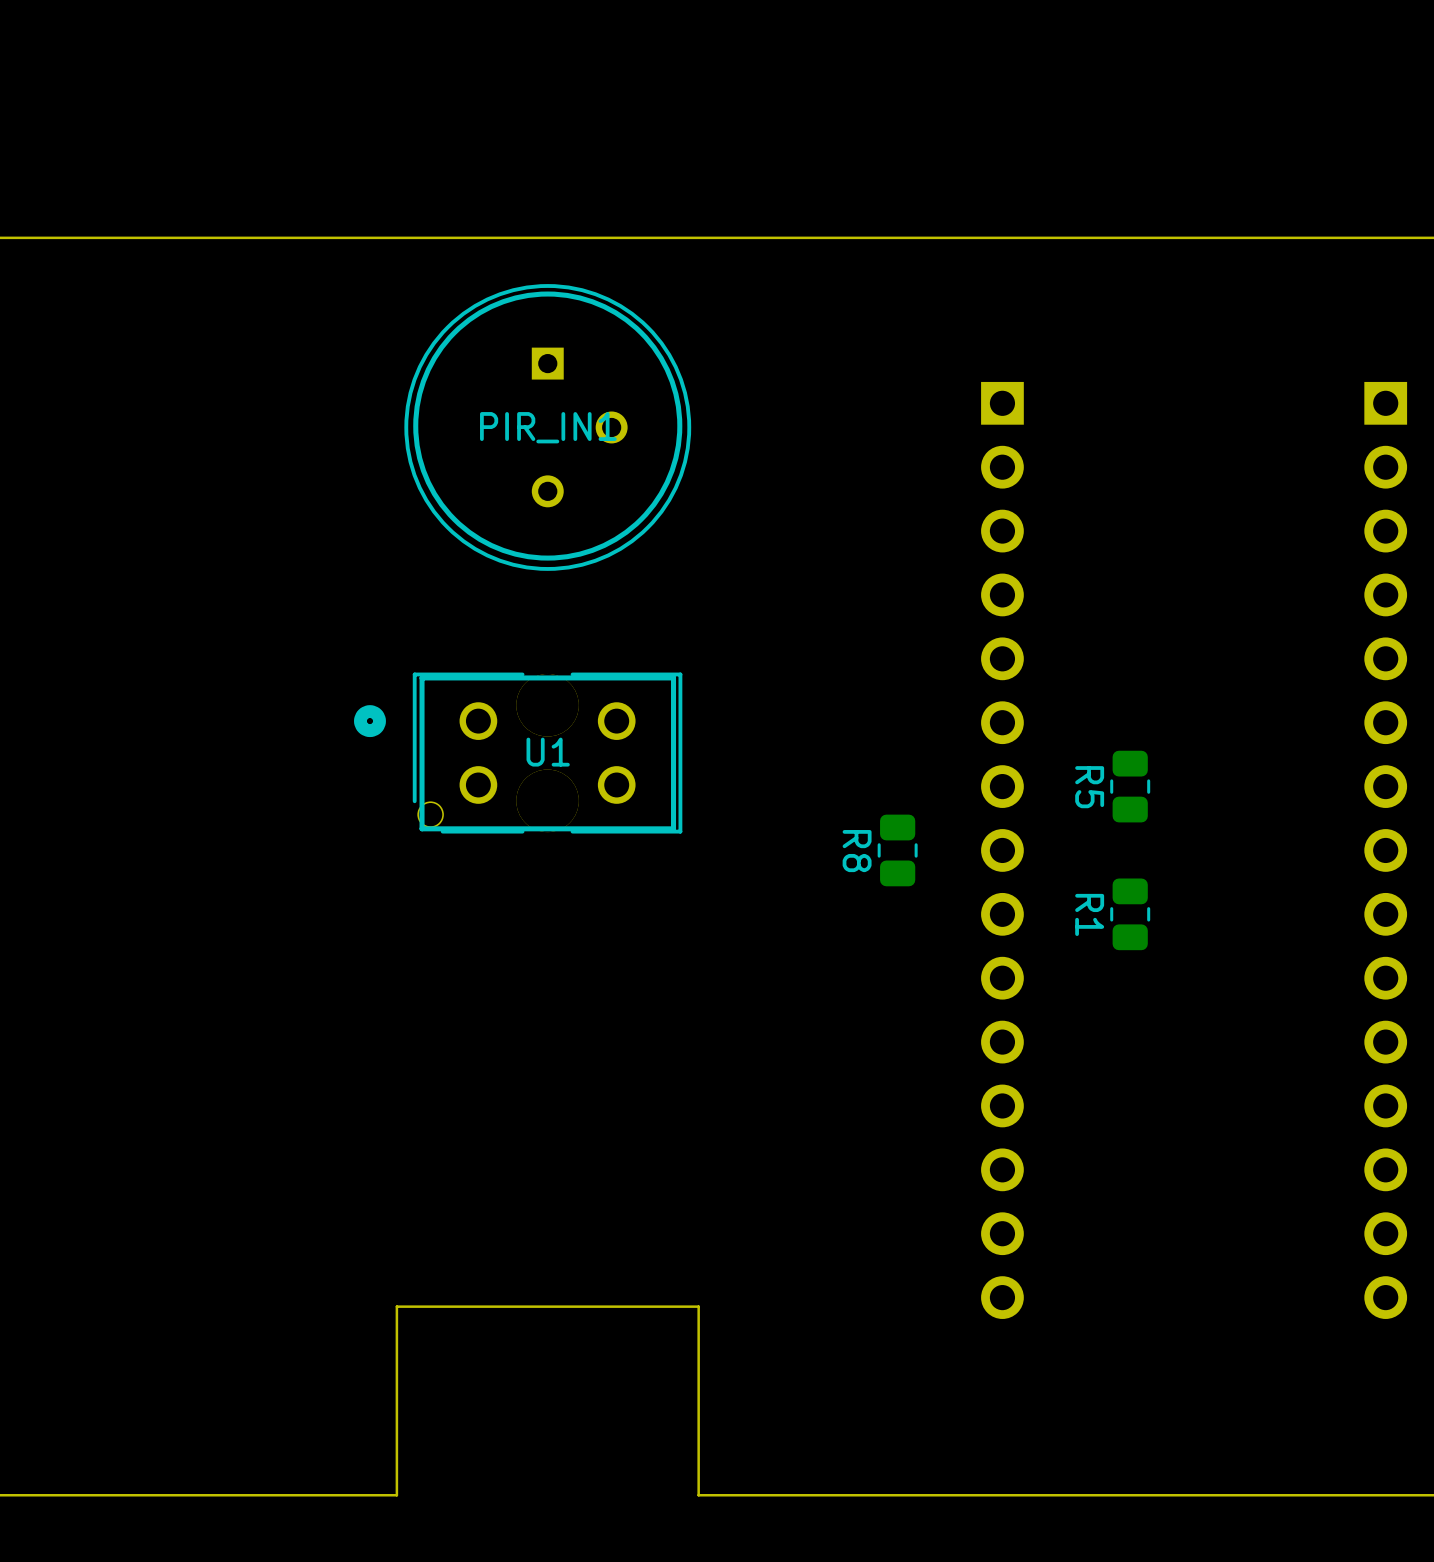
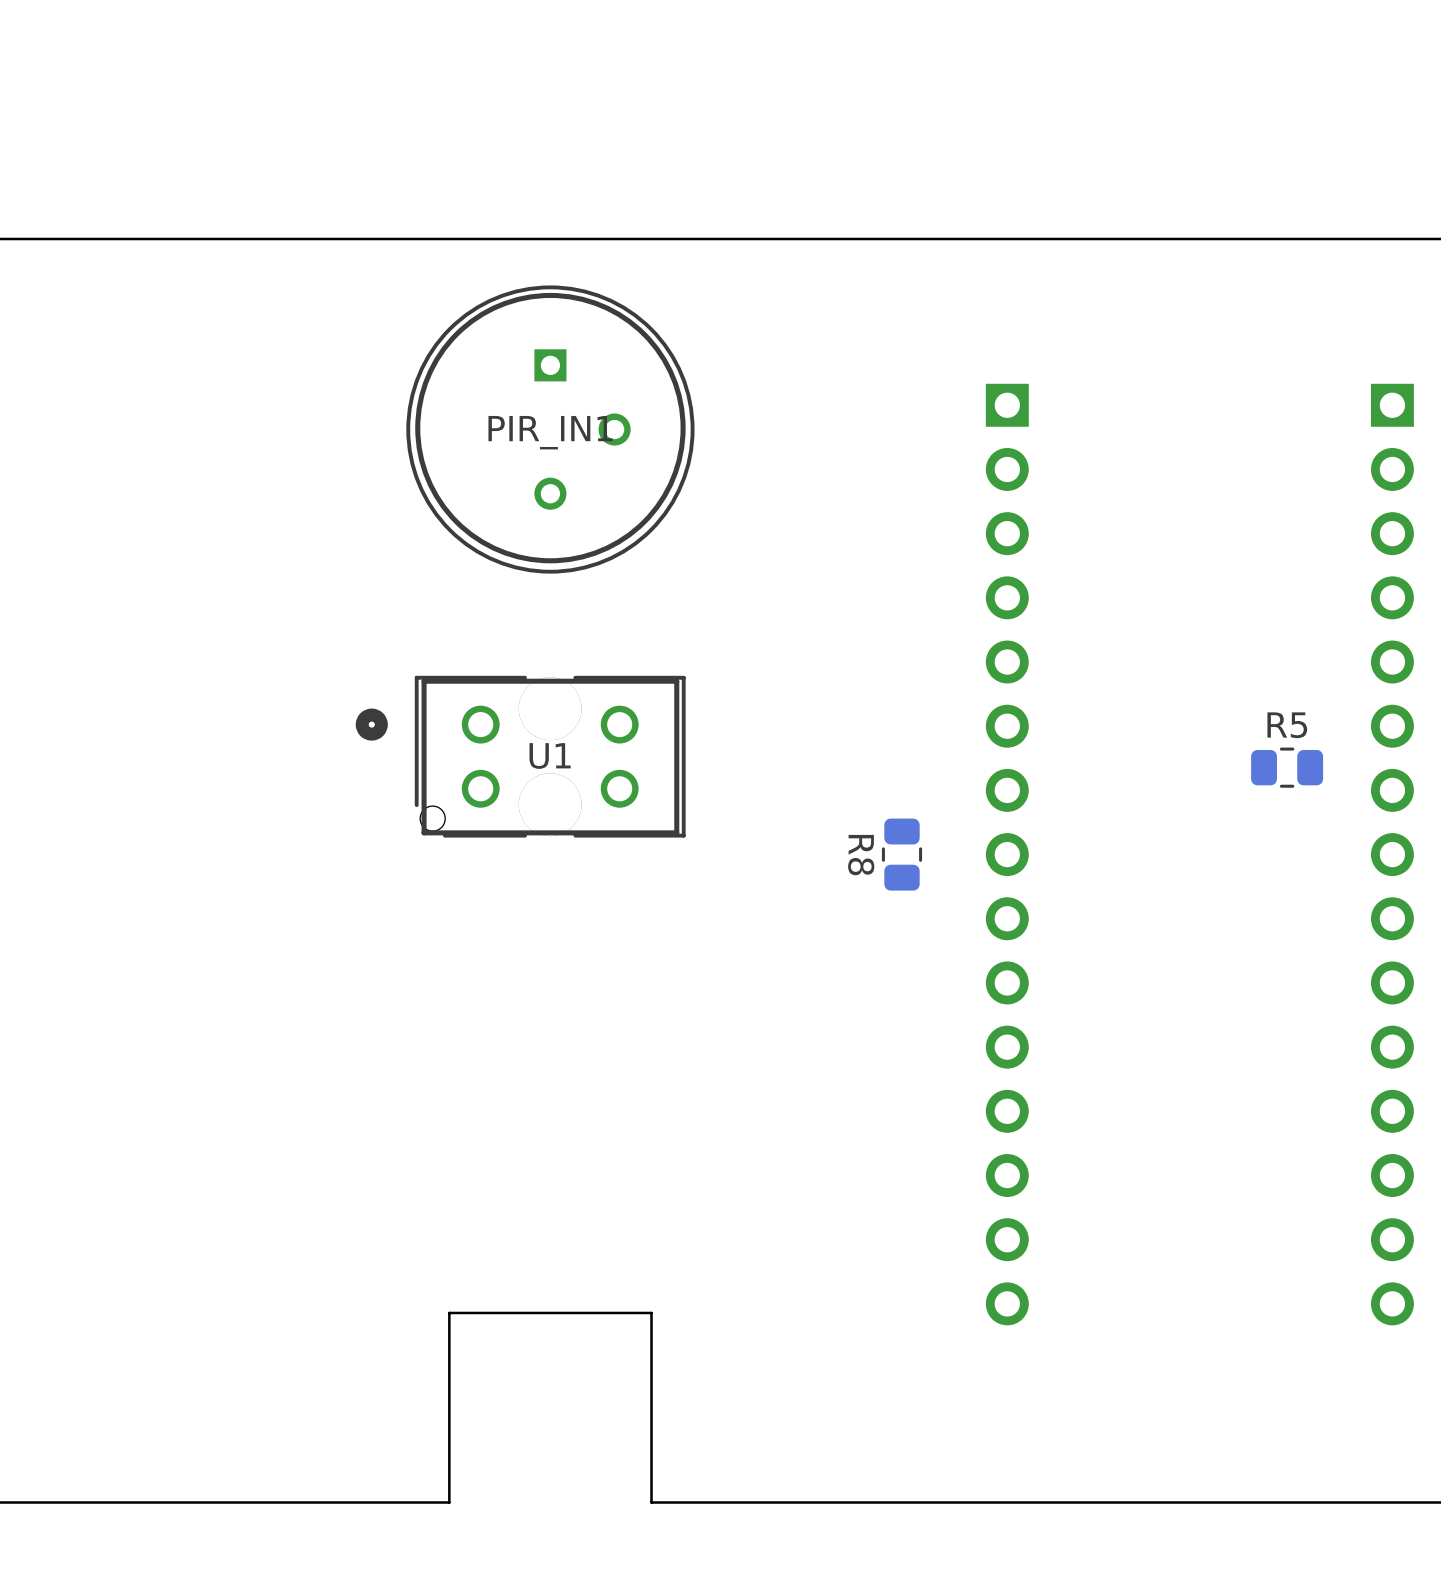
R5 rotation: 0° (1130, 786) -> 90° clockwise (1287, 767)
R5 position: (1130, 786) -> (1287, 767)
R1: (1130, 914) -> none
board edge: (447, 1306) (396, 1306) (396, 1495) -> (449, 1312) (449, 1502) (398, 1502)
board edge: (648, 1306) (698, 1306) (698, 1495) -> (651, 1312) (651, 1502) (702, 1502)

